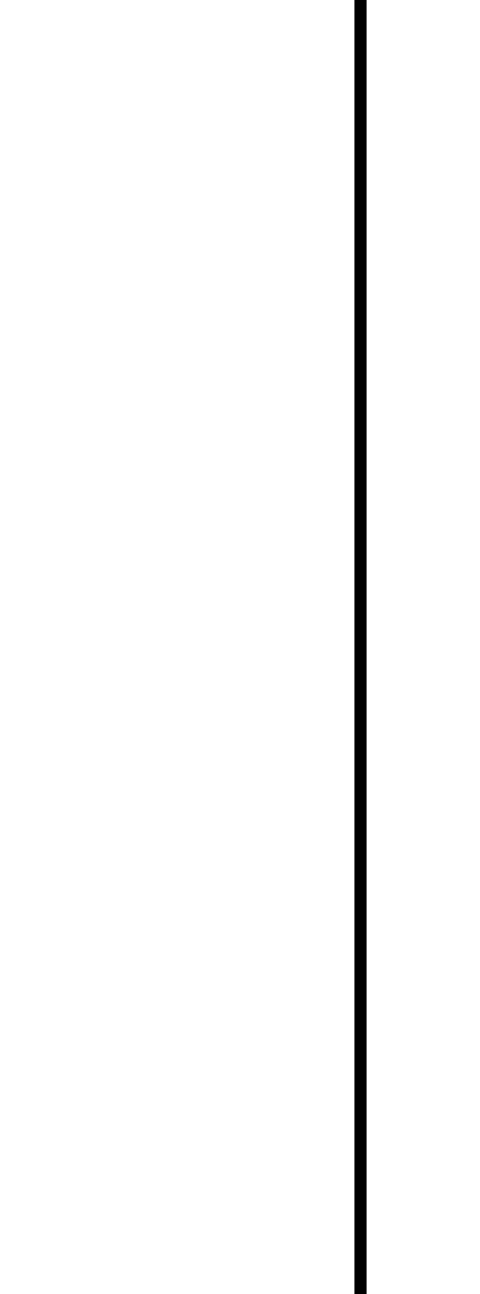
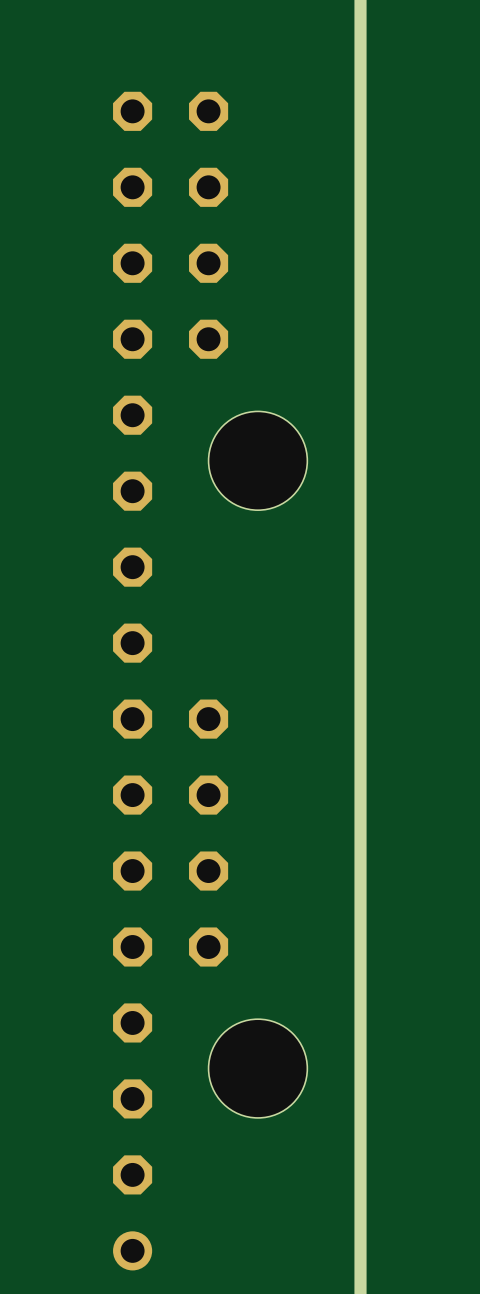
part: none -> (210, 681)

